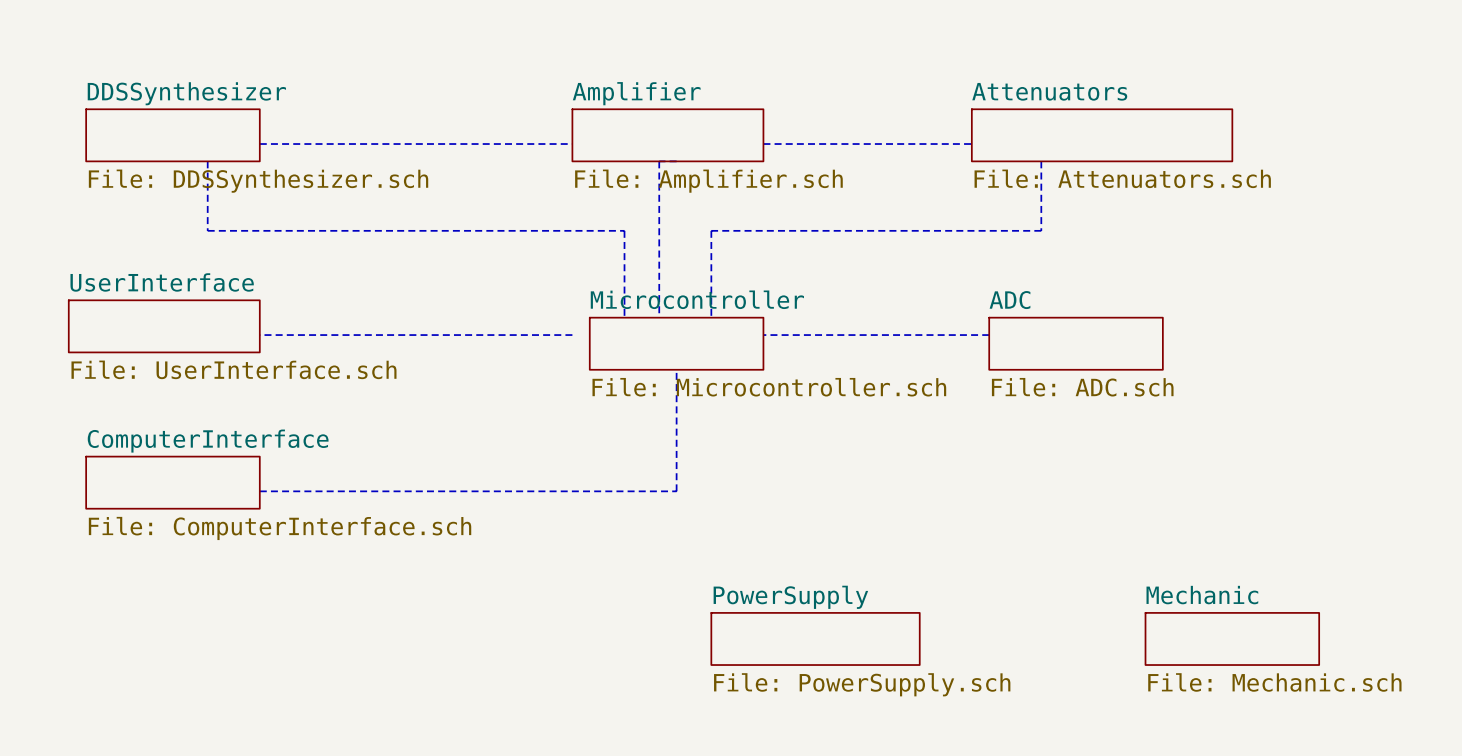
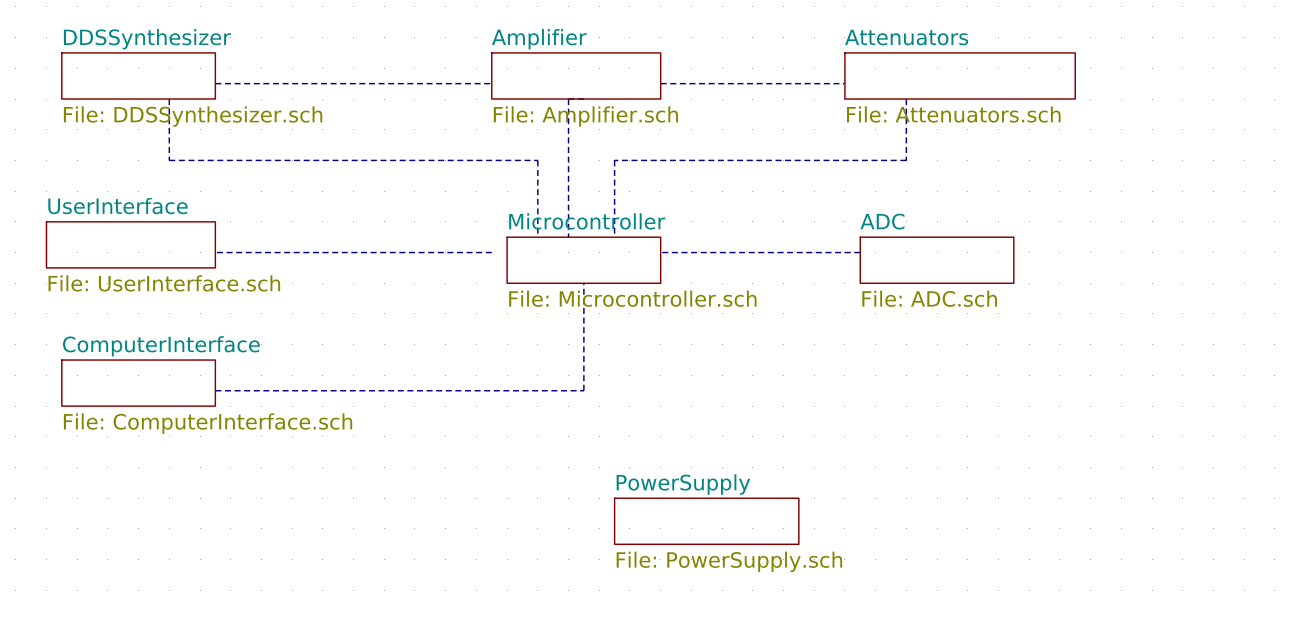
sheet Mechanic: File: Mechanic.sch (1232, 638) -> none

